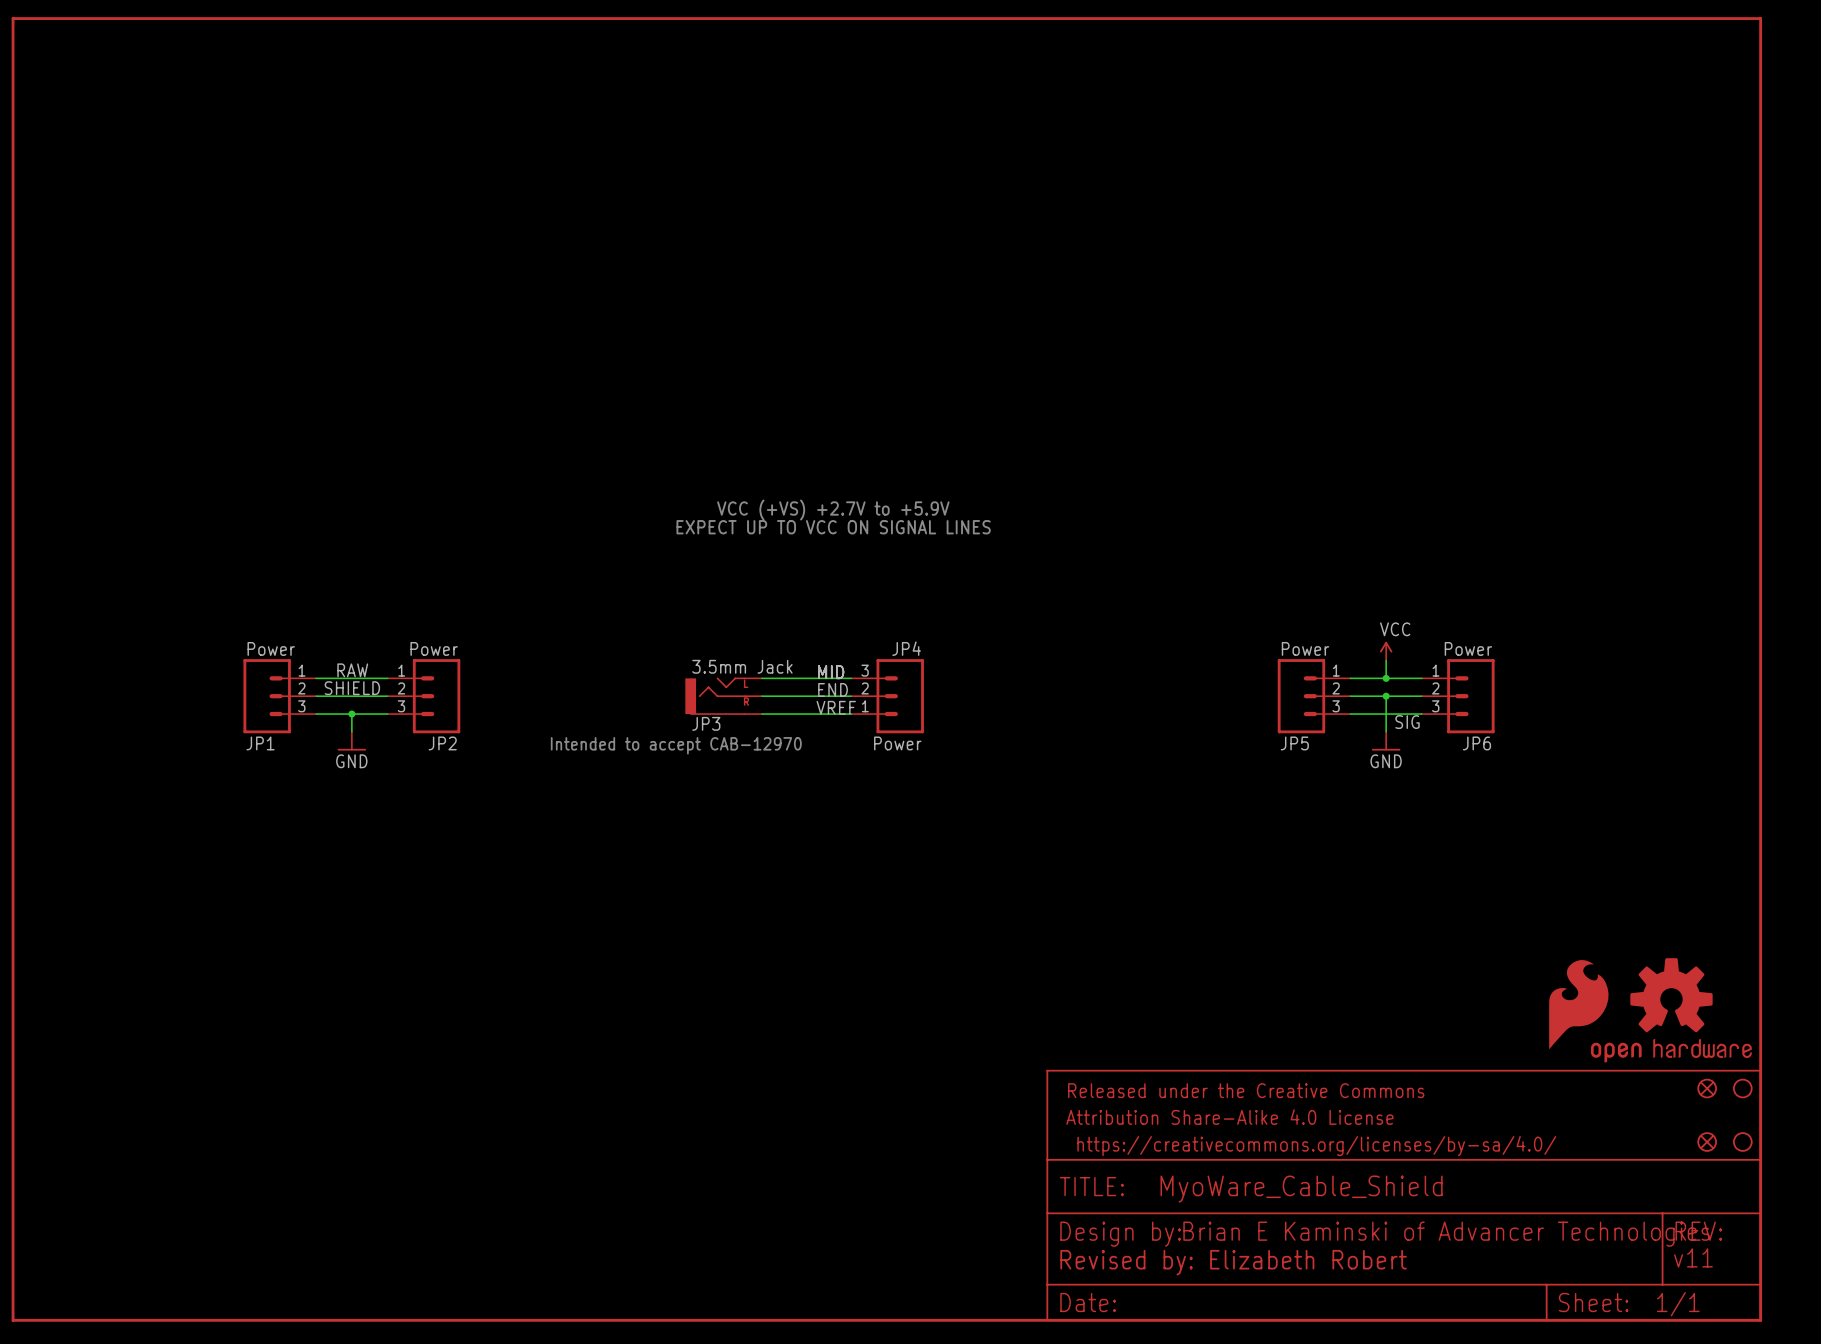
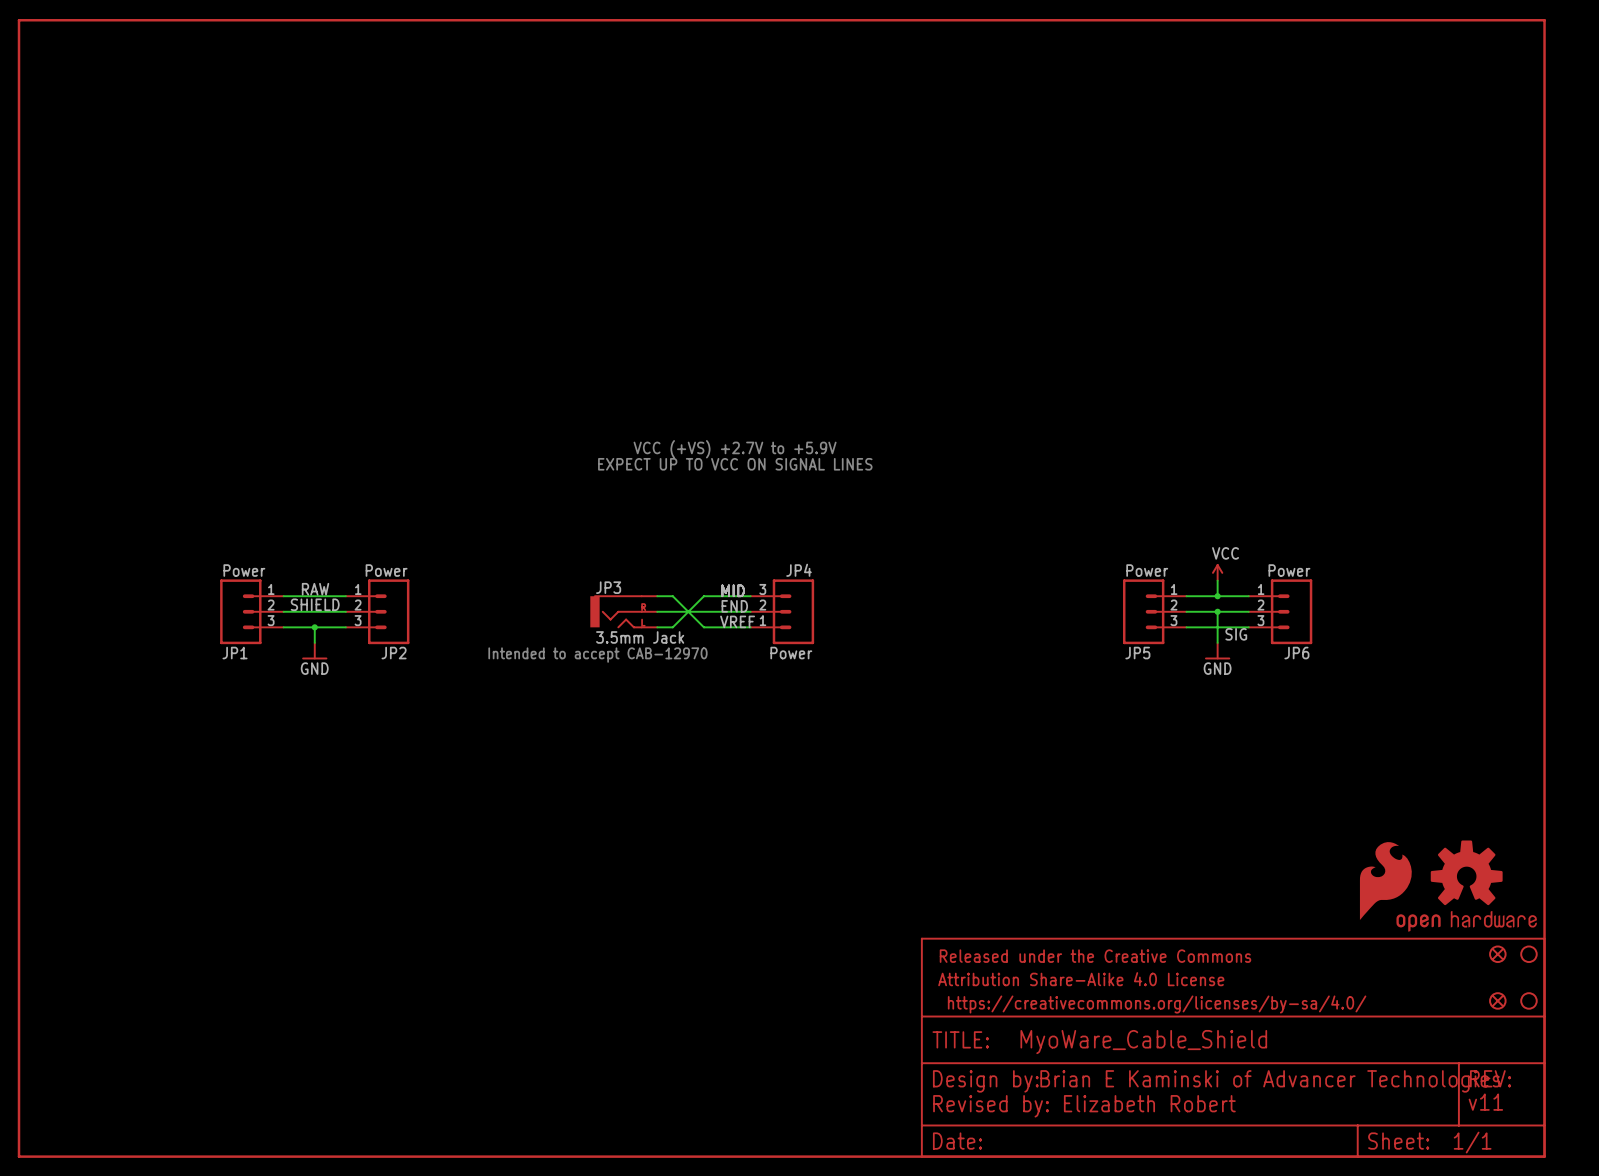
JP3 value position: 3.5mm Jack (742, 666) -> 3.5mm Jack (640, 637)
JP3 symbol: [685, 677, 763, 715] -> [590, 595, 658, 628]
wire: (762, 678) (797, 678) -> (657, 627) (672, 627) (703, 596)
wire: (762, 714) (797, 714) -> (657, 596) (672, 596) (703, 627)
JP3 name position: JP3 (706, 723) -> JP3 (608, 587)

